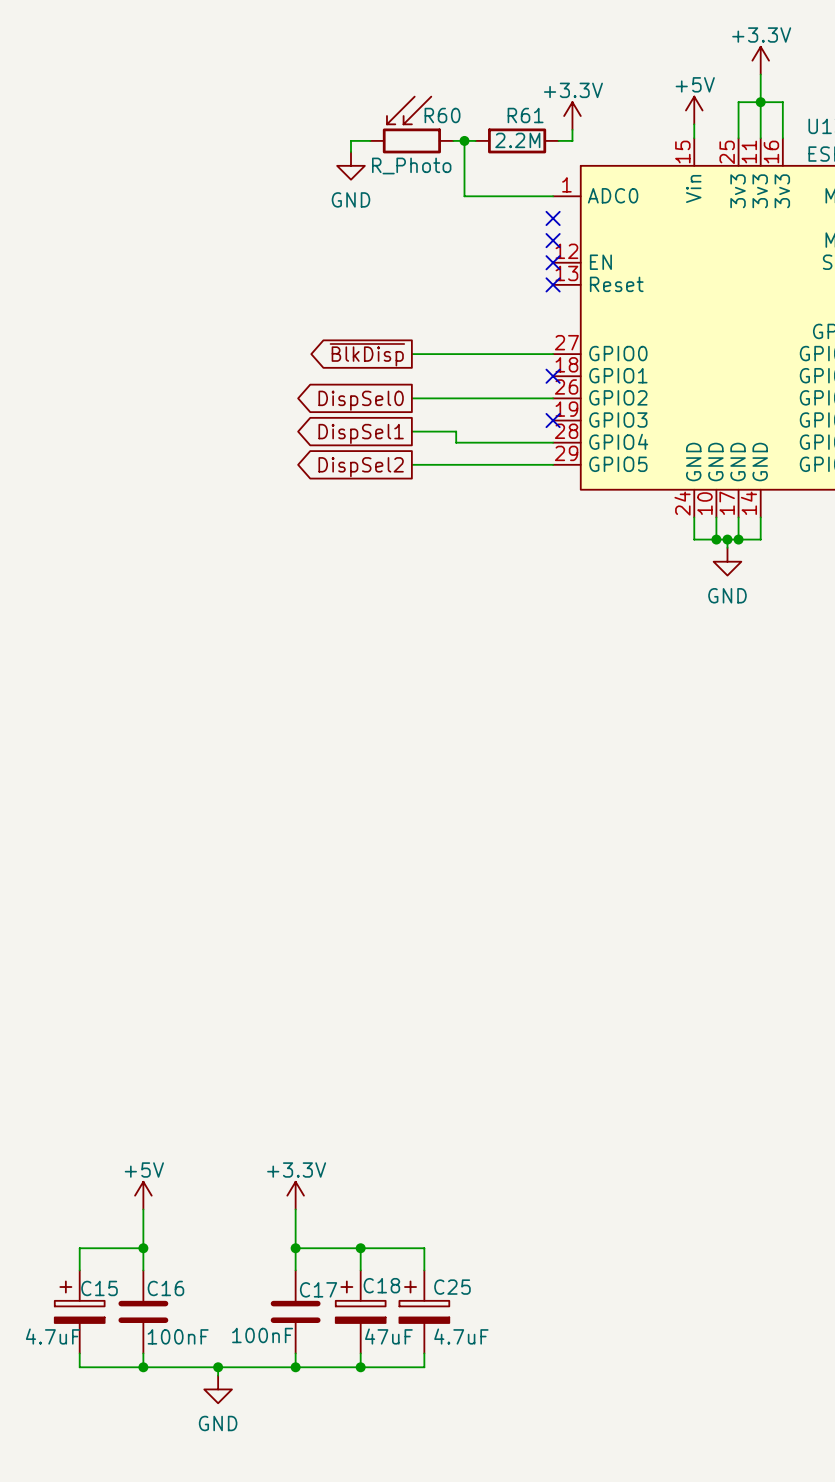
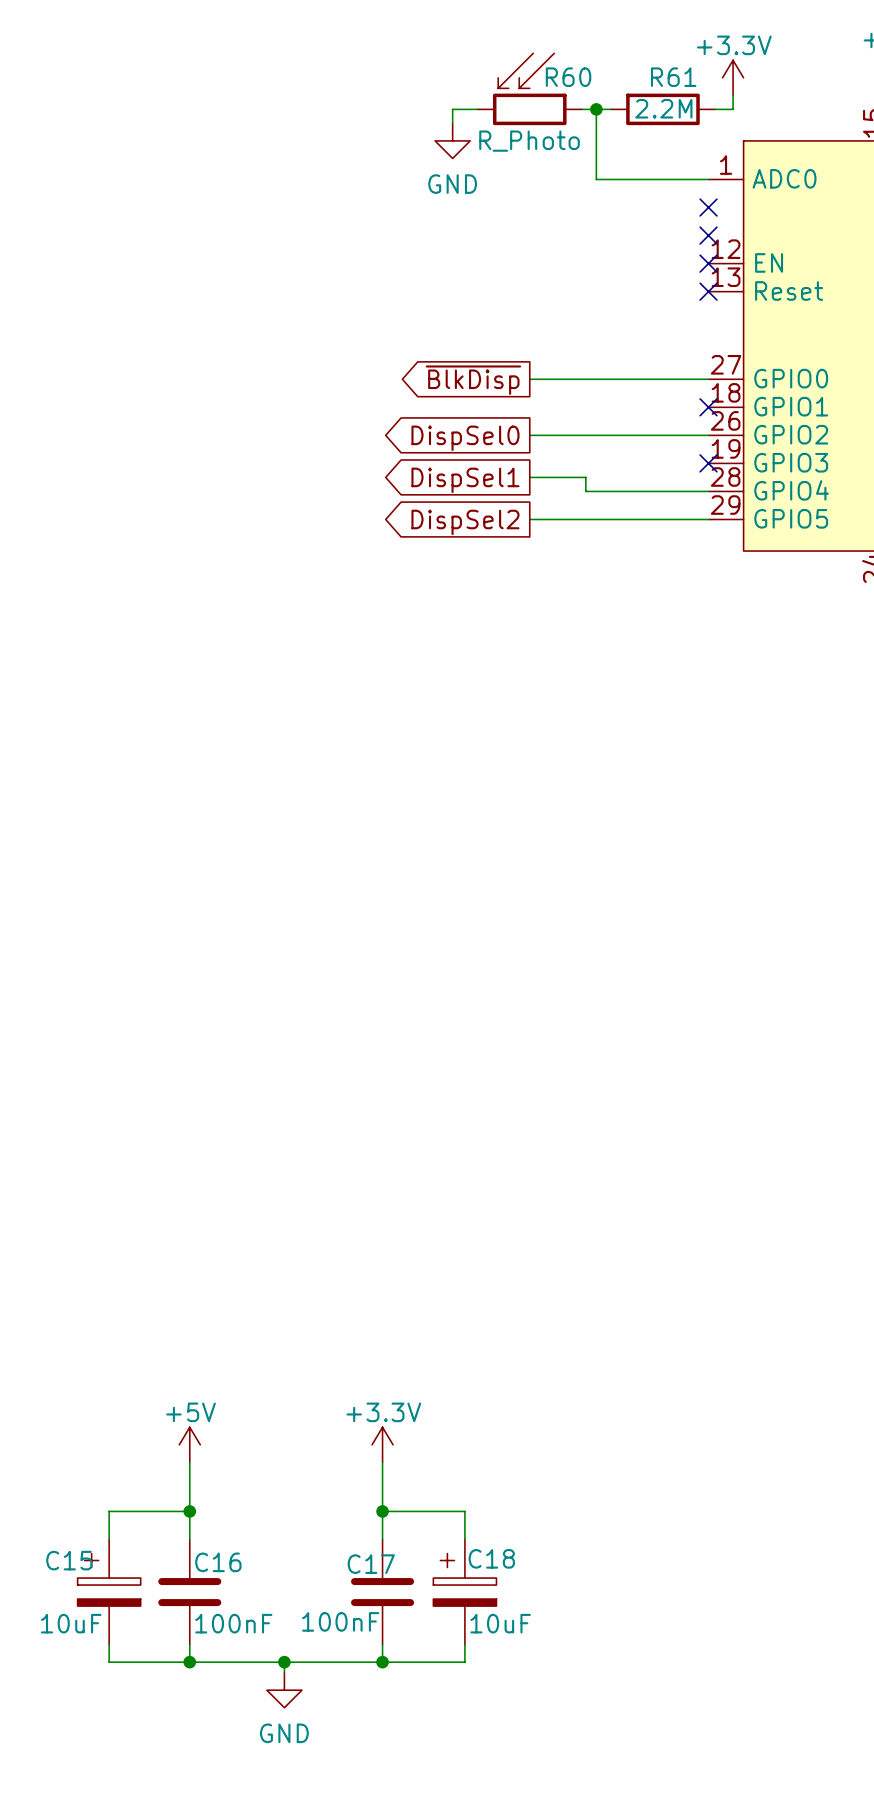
wire: (360, 1248) (424, 1248) (424, 1270) -> none
junction: (360, 1248) -> none
C15 name position: C15 (99, 1288) -> C15 (69, 1560)
C17 name position: C17 (318, 1289) -> C17 (371, 1564)
C25: 4.7uF (424, 1311) -> none
C15 value: 4.7uF (53, 1336) -> 10uF (71, 1623)
C18 value: 47uF (388, 1336) -> 10uF (500, 1623)
wire: (424, 1353) (424, 1367) (360, 1367) -> none
junction: (360, 1367) -> none

